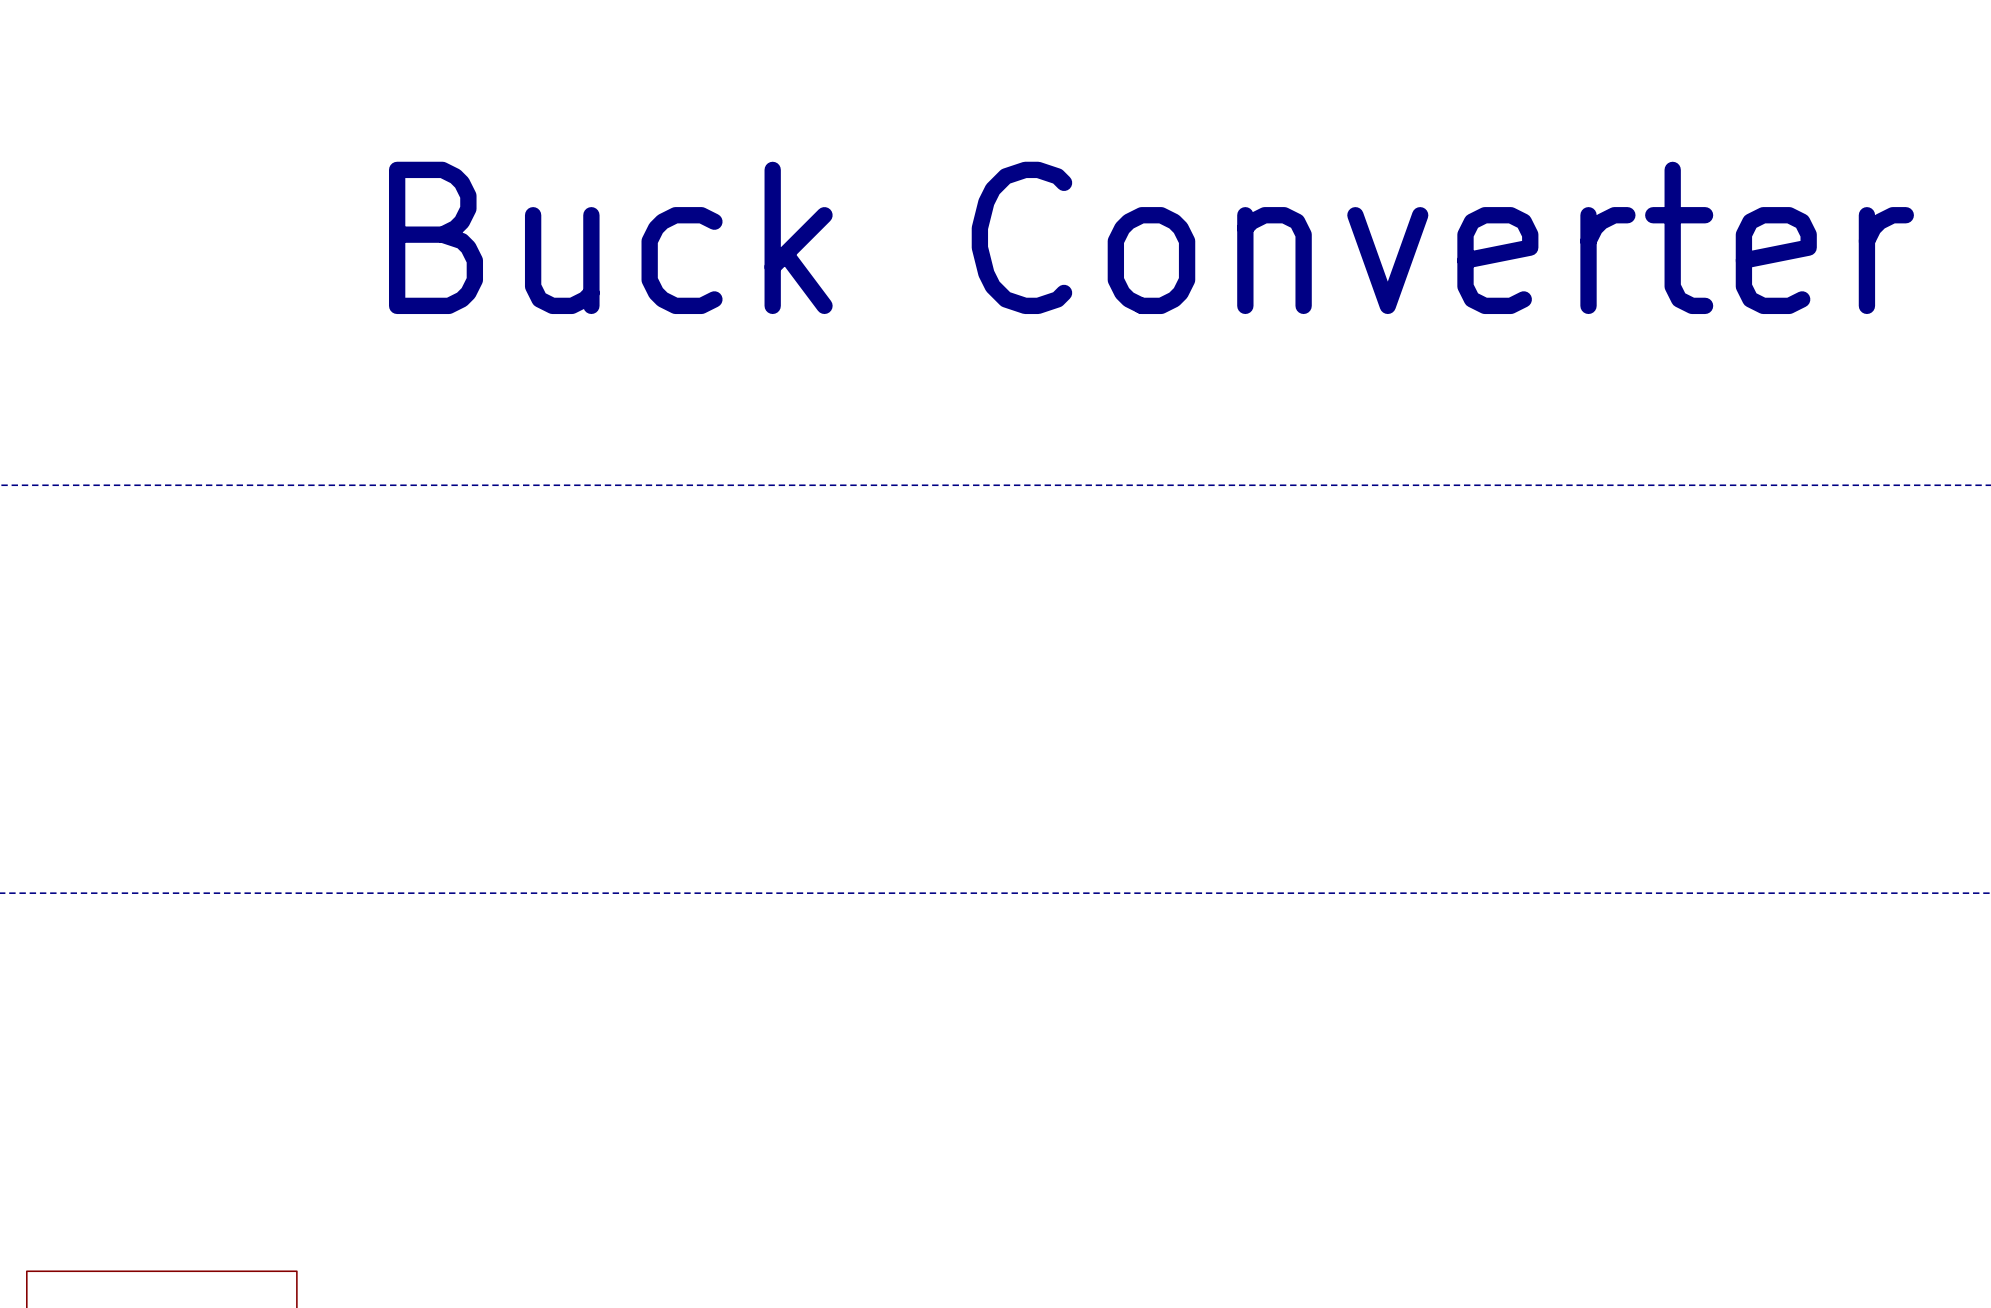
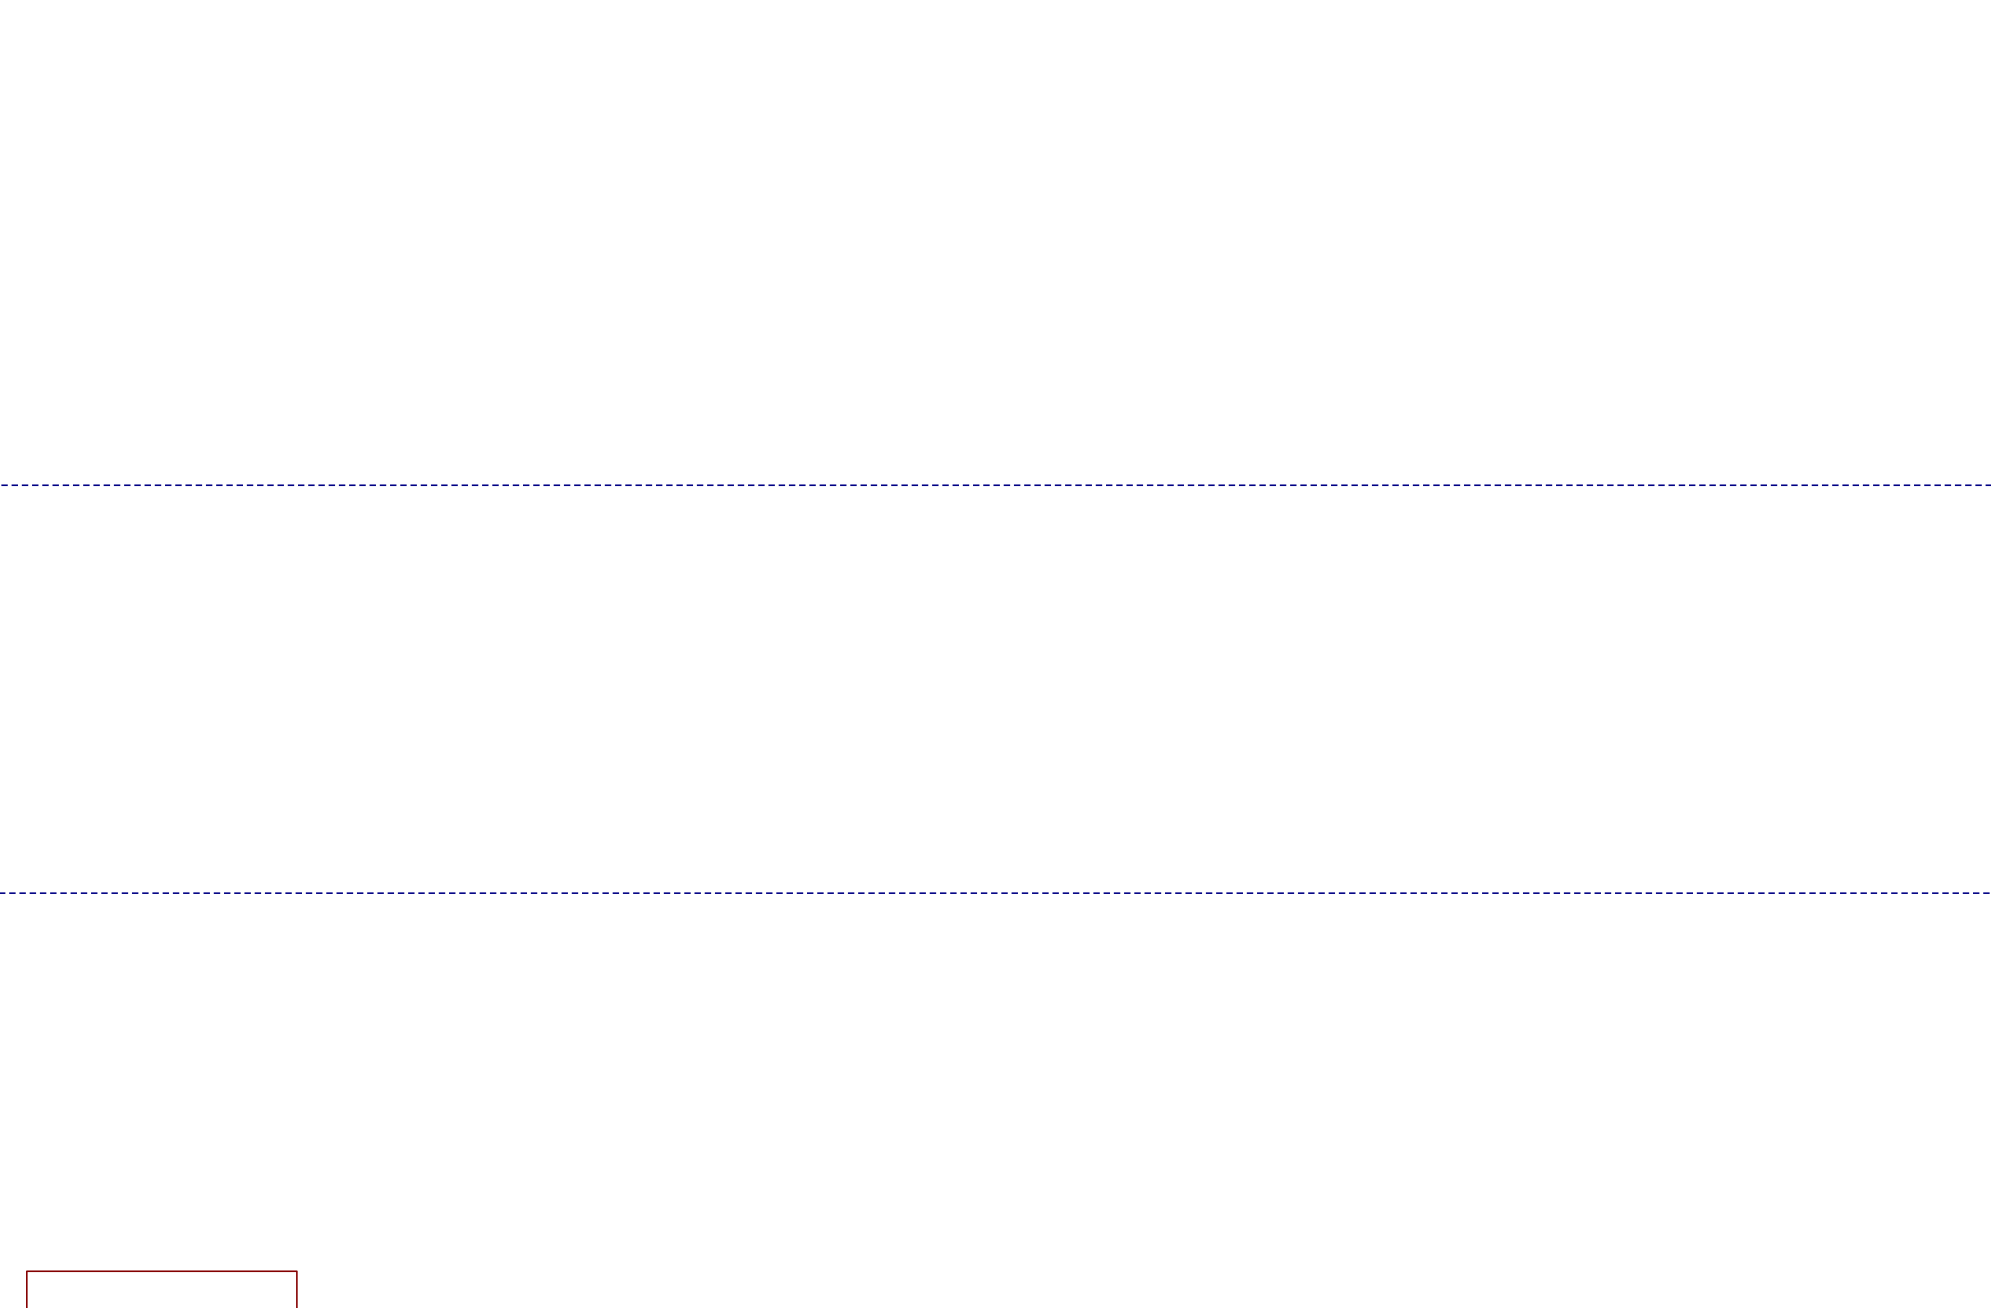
text: Buck Converter (1151, 237) -> none

